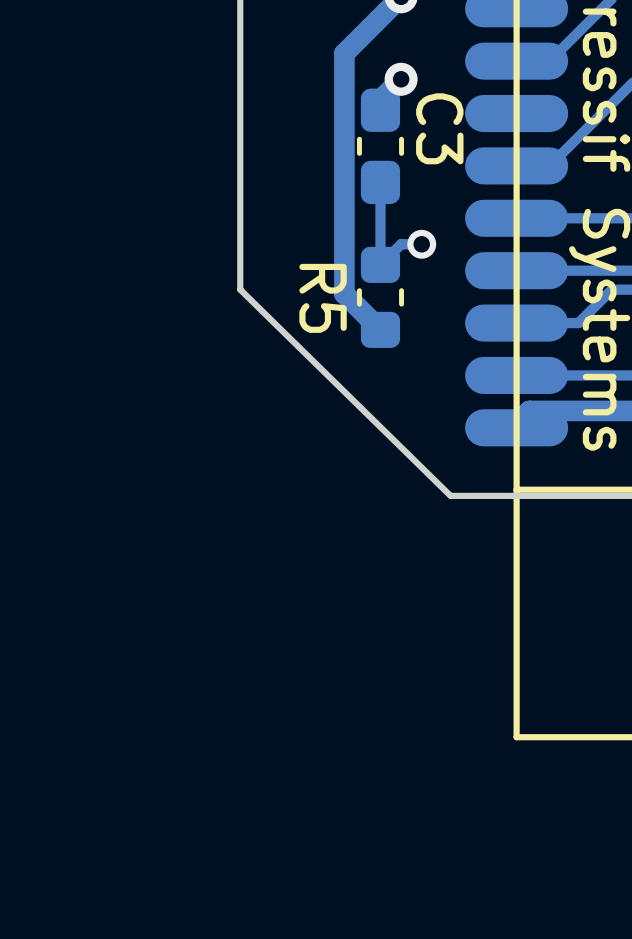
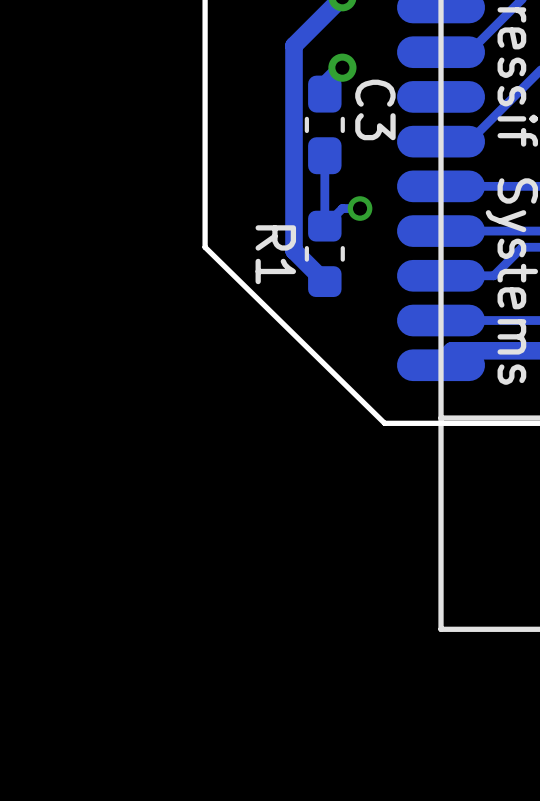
R5 name: R5 (323, 298) -> R1 (275, 254)

